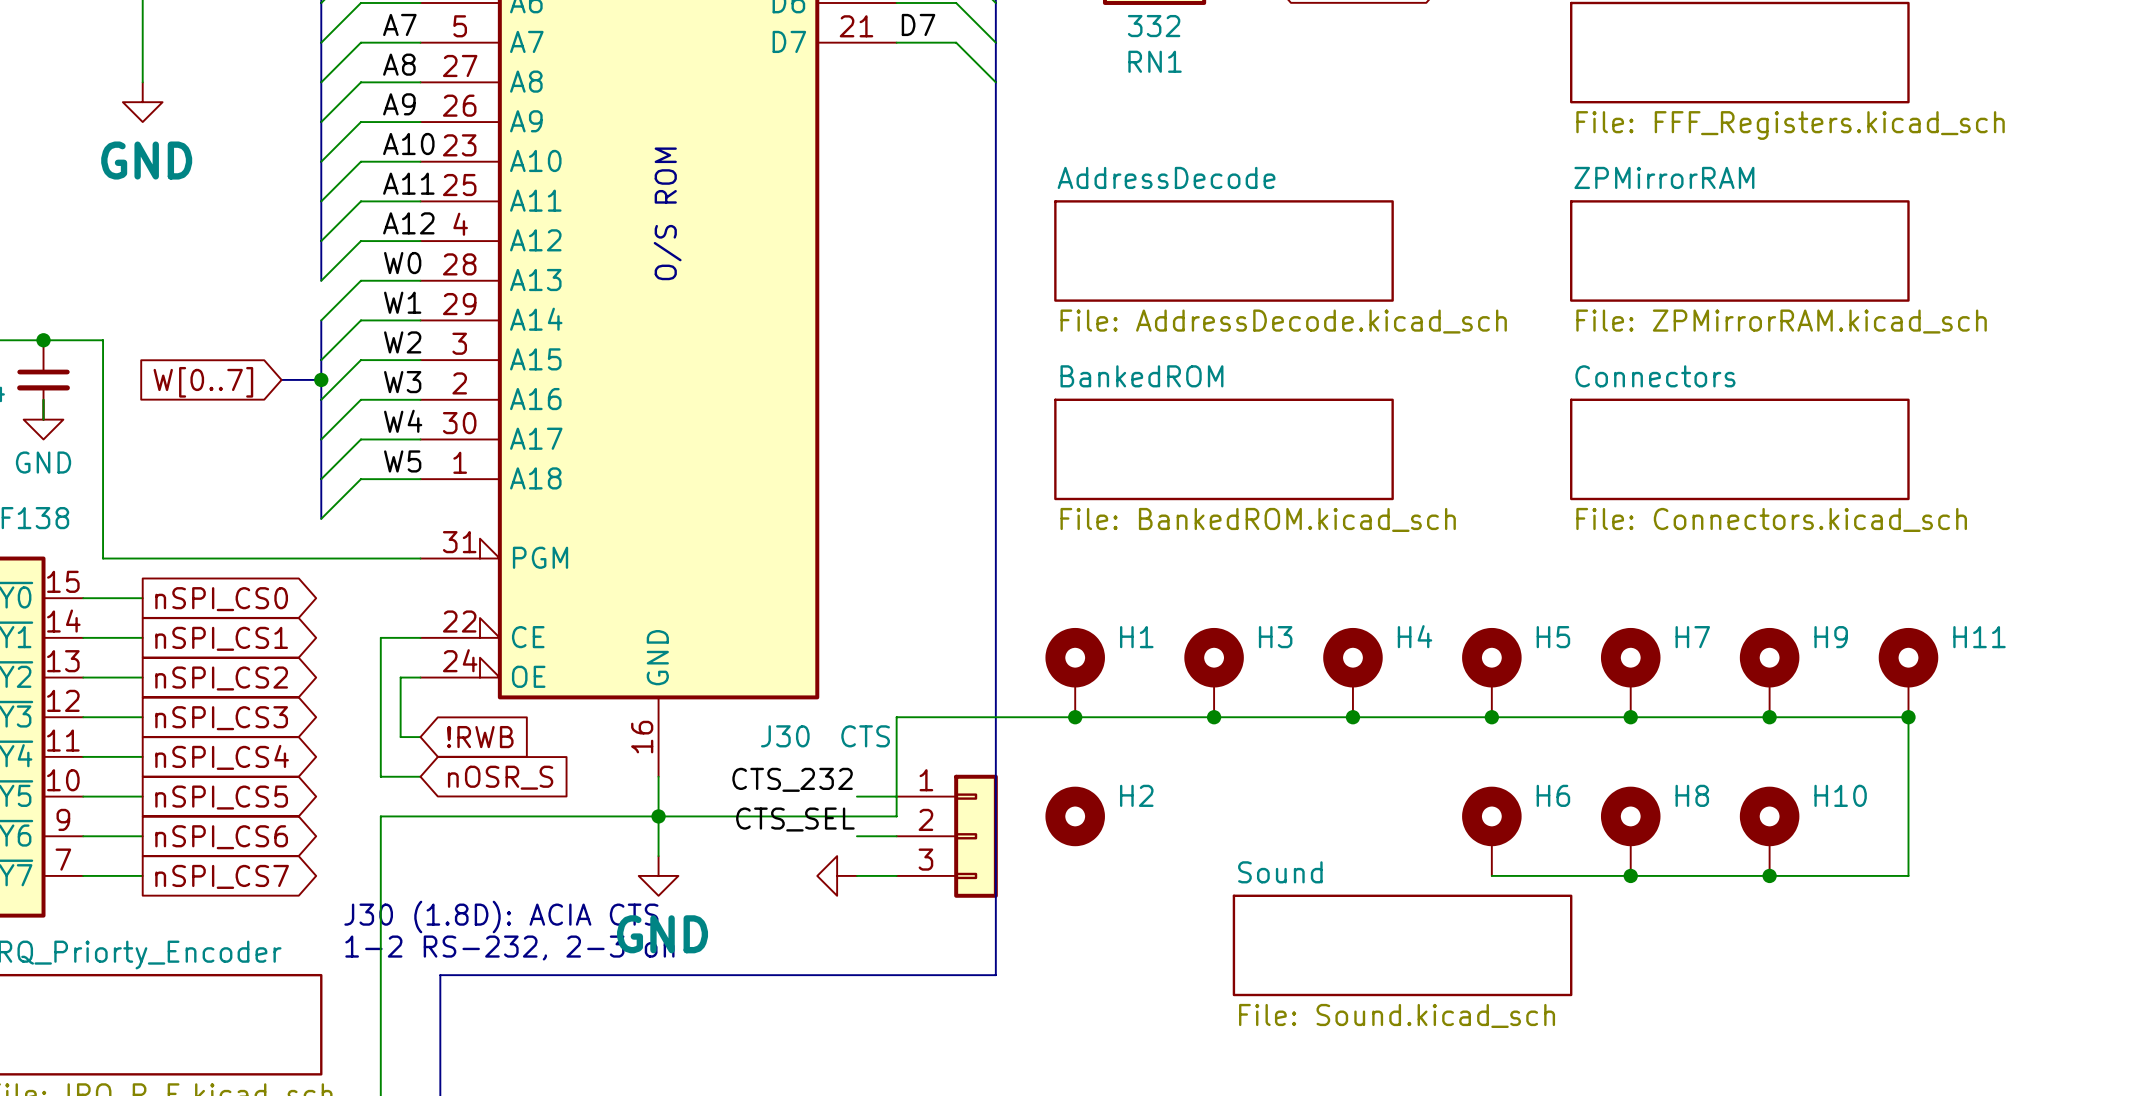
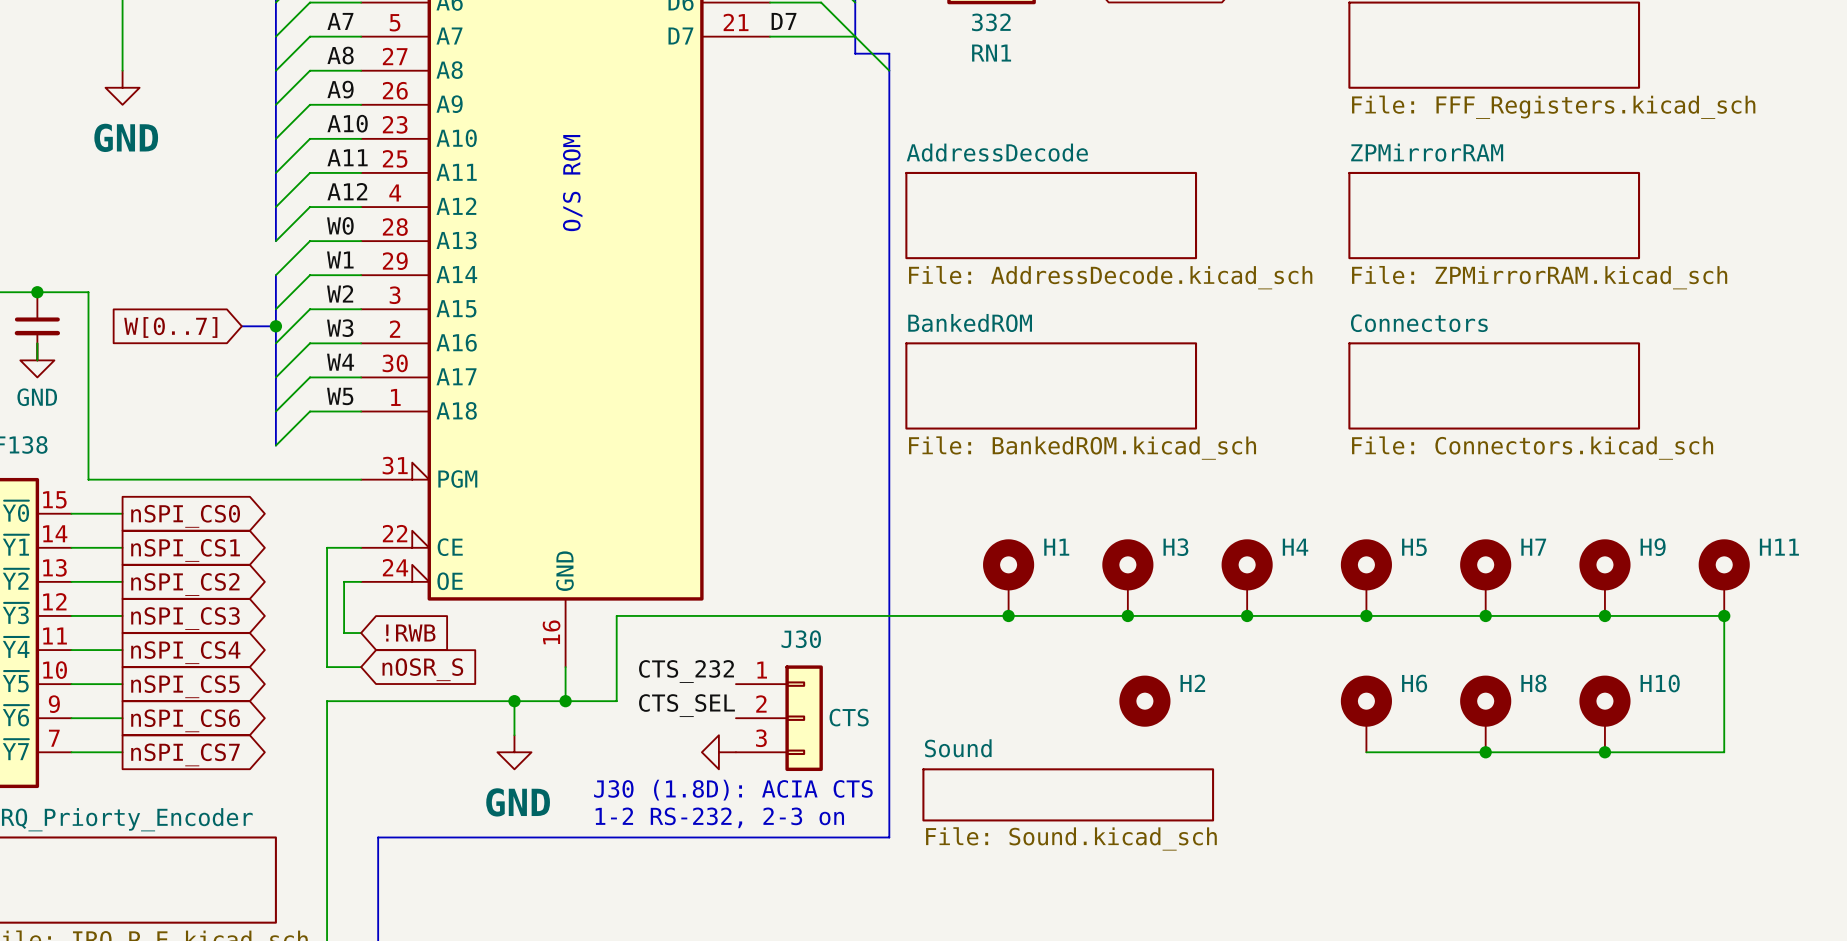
wire: (956, 42) (995, 82) -> (821, 36) (855, 36) (889, 70)
bus: (995, 62) (995, 975) -> (855, 53) (889, 53) (889, 837) (855, 837)
H1 position: (1075, 672) -> (1008, 577)
H3 position: (1214, 672) -> (1127, 577)
H4 position: (1352, 672) -> (1247, 577)
H5 position: (1491, 672) -> (1366, 577)
H7 position: (1630, 672) -> (1485, 577)
H9 position: (1769, 672) -> (1604, 577)
H11 position: (1908, 672) -> (1724, 577)
wire: (896, 717) (896, 816) (718, 816) -> (770, 615) (616, 615) (616, 701)
junction: (1075, 717) -> none
junction position: (1214, 717) -> (1008, 615)
junction position: (1352, 717) -> (1127, 615)
junction position: (1491, 717) -> (1247, 615)
junction position: (1630, 717) -> (1366, 615)
junction position: (1769, 717) -> (1485, 615)
wire: (1908, 717) (1908, 875) -> (1639, 615) (1724, 615) (1724, 752) (1639, 752)
junction position: (1908, 717) -> (1604, 615)
junction: none -> (1724, 615)
J30 name position: J30 (785, 736) -> J30 (801, 639)
J30 value position: CTS (865, 736) -> CTS (849, 717)
junction: none -> (514, 701)
wire: (658, 816) (658, 856) -> (514, 701) (514, 735)
H2 position: (1075, 816) -> (1144, 701)
H6 position: (1491, 831) -> (1366, 713)
H8 position: (1630, 831) -> (1485, 713)
H10 position: (1769, 831) -> (1604, 713)
J30 position: (947, 836) -> (779, 718)
power symbol position: GND (658, 875) -> GND (514, 752)
wire: (1491, 875) (1591, 875) -> none
junction: (1630, 875) -> none
junction position: (1769, 875) -> (1485, 752)
junction: none -> (1604, 752)
text position: J30 (1.8D): ACIA CTS (501, 916) -> J30 (1.8D): ACIA CTS (733, 790)
sheet Sound: none -> File: Sound.kicad_sch (1068, 794)
sheet Sound: File: Sound.kicad_sch (1402, 945) -> none
text position: 1-2 RS-232, 2-3 on (509, 947) -> 1-2 RS-232, 2-3 on (719, 817)

